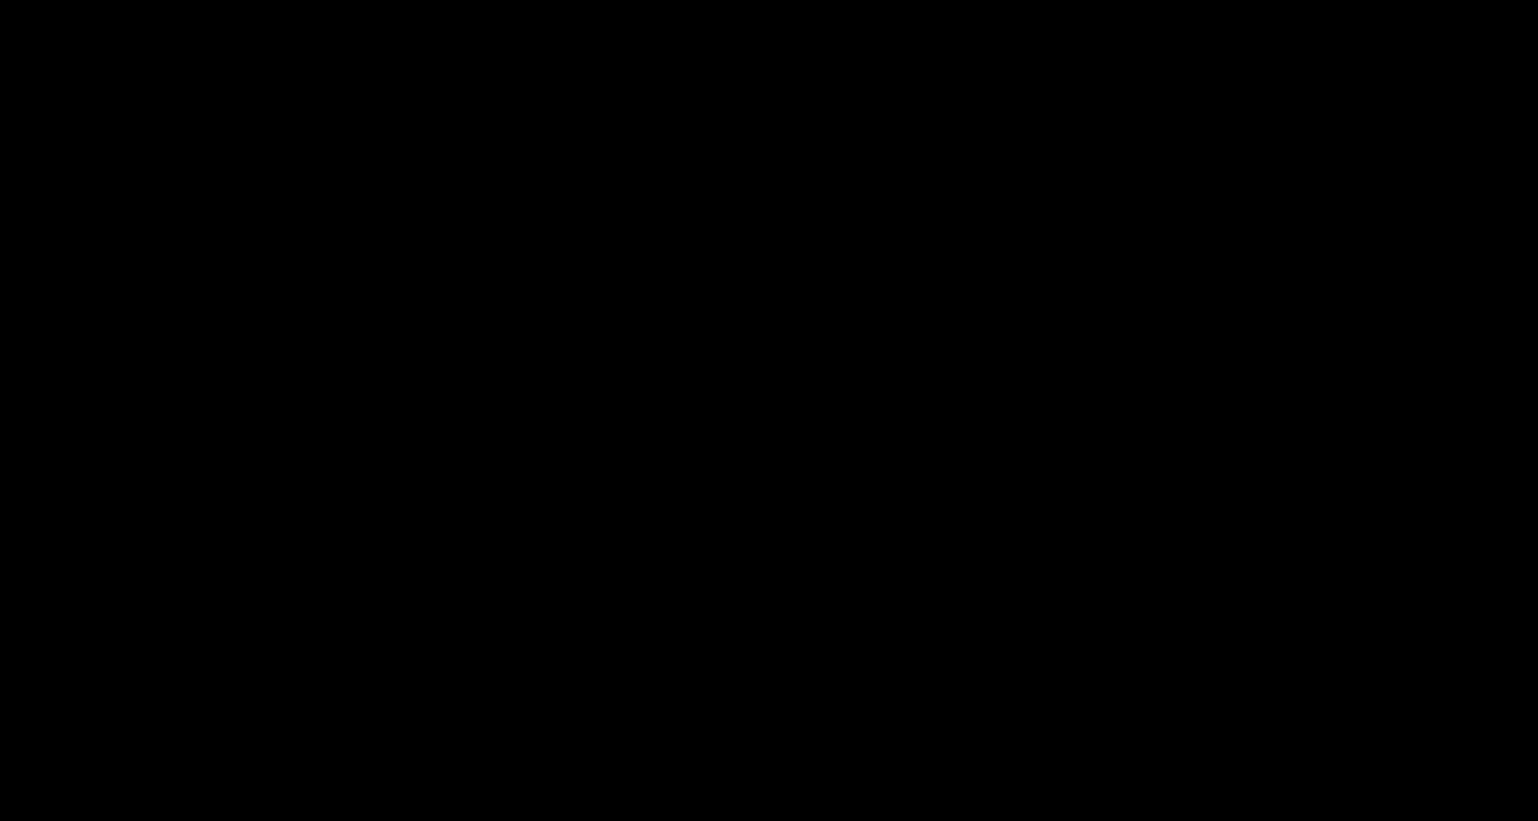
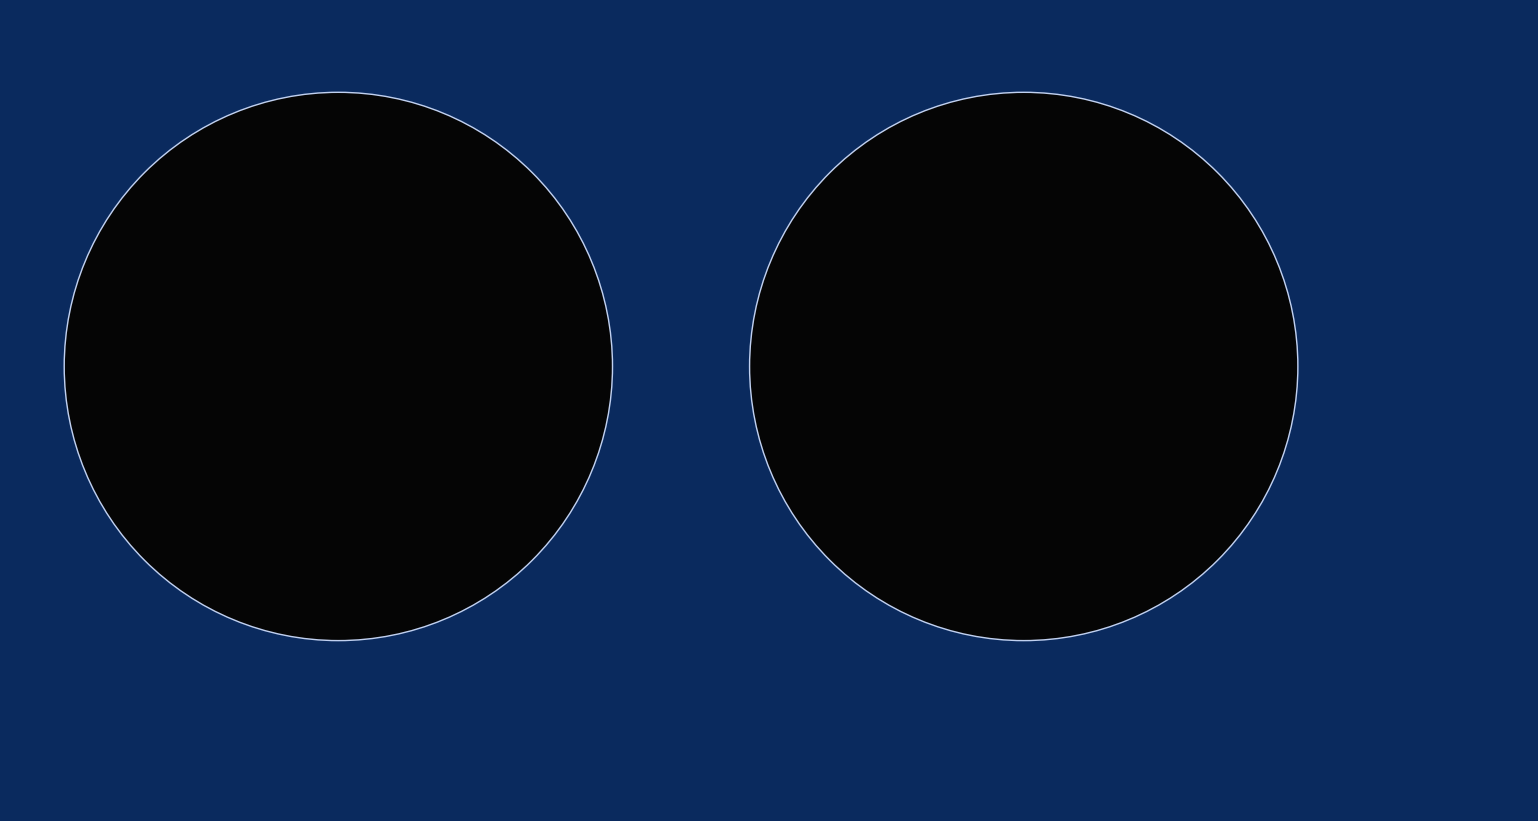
part: none -> (338, 366)
part: none -> (1023, 366)

